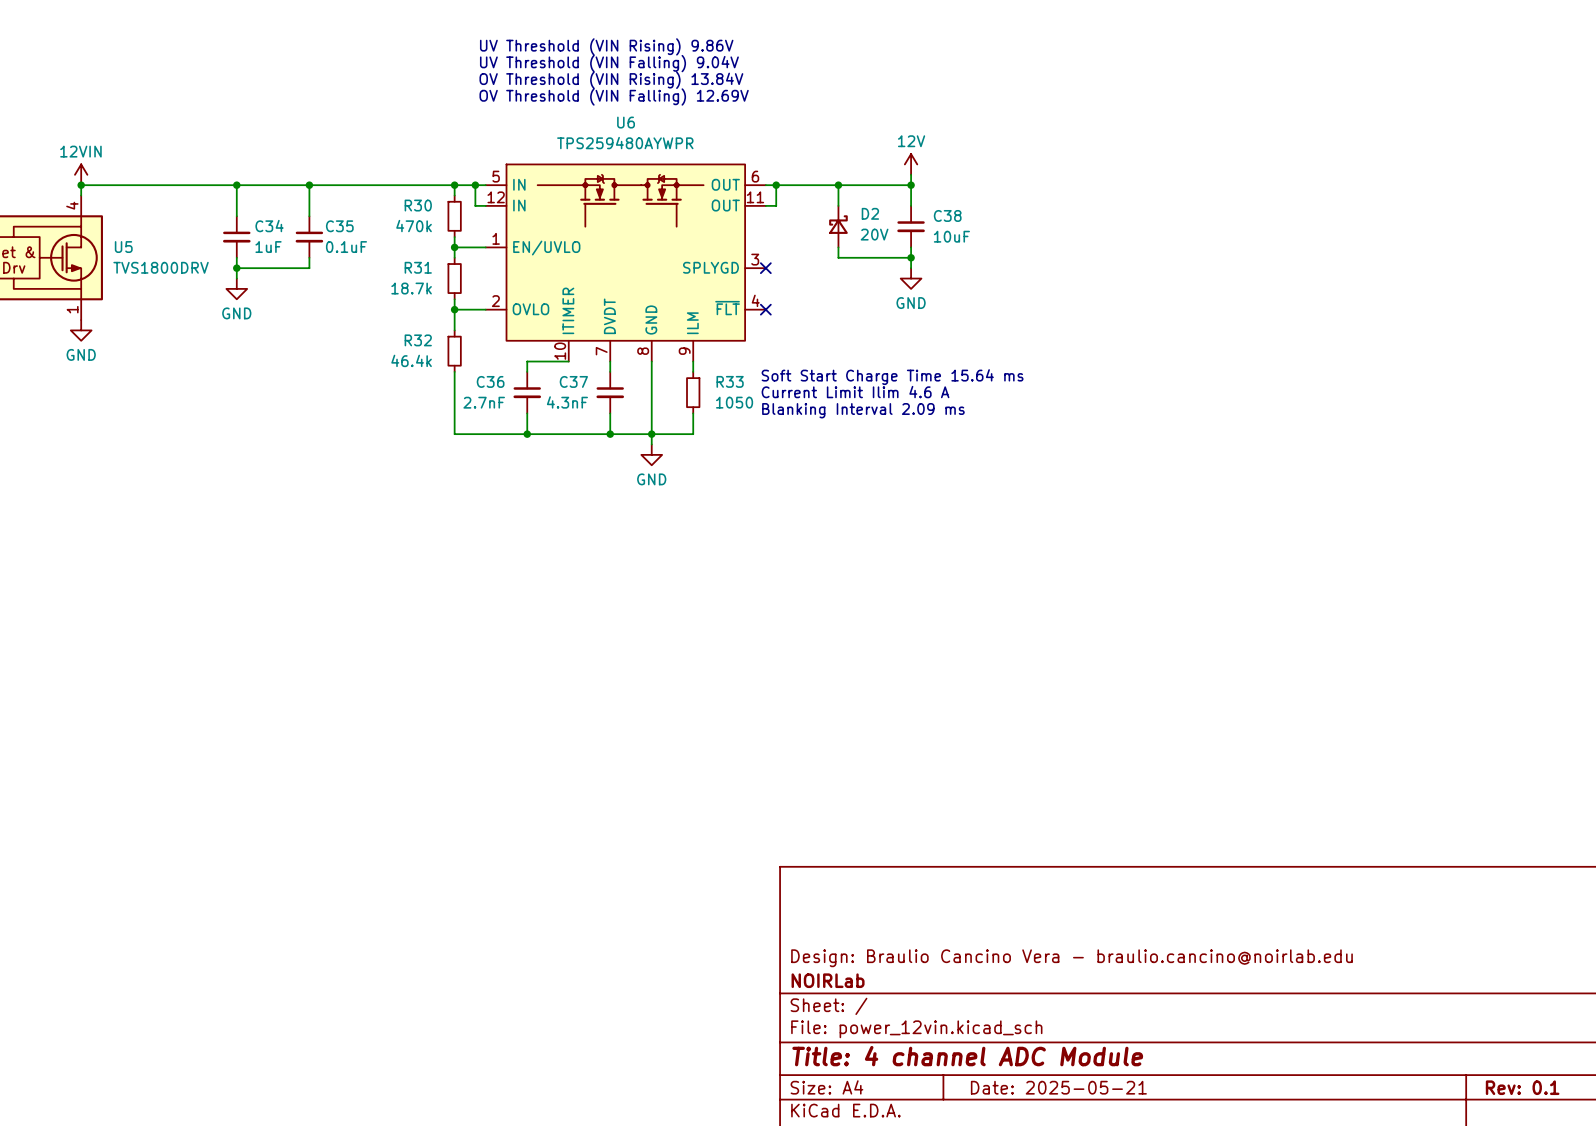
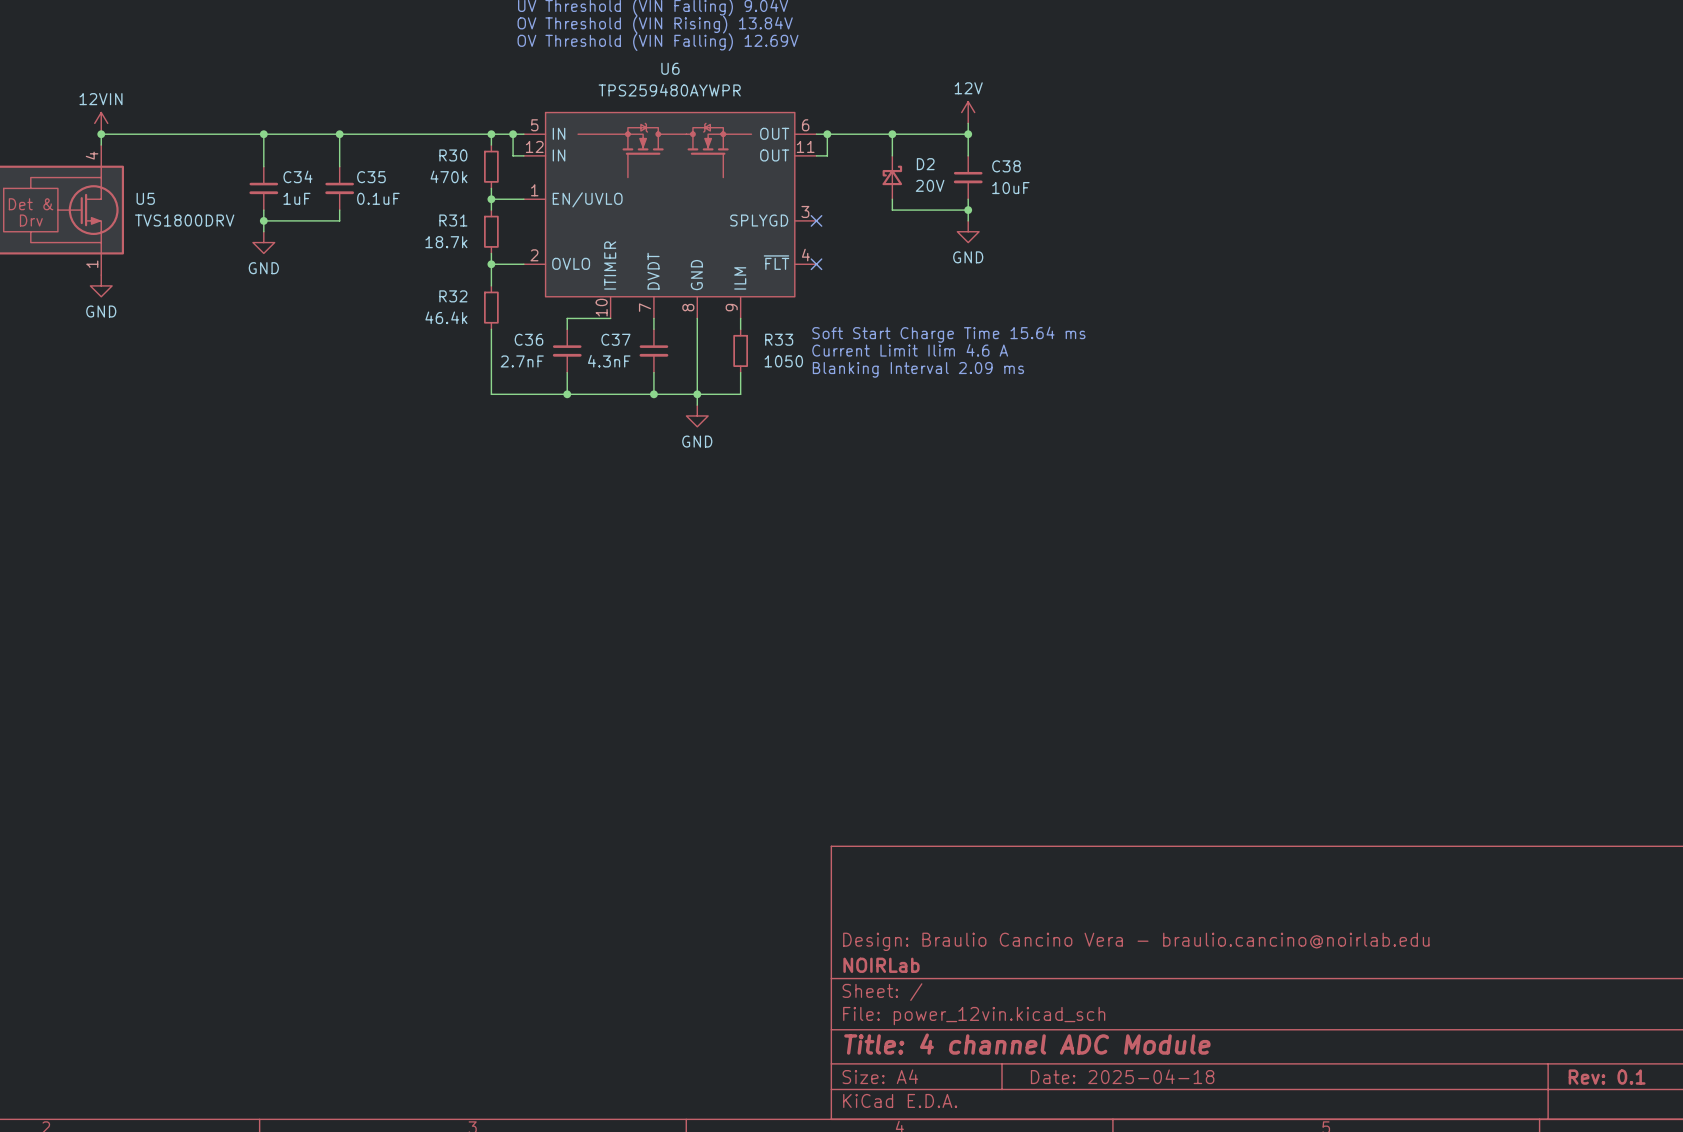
title block: Date: 2025-05-21 (1058, 1087) -> Date: 2025-04-18 (1122, 1076)

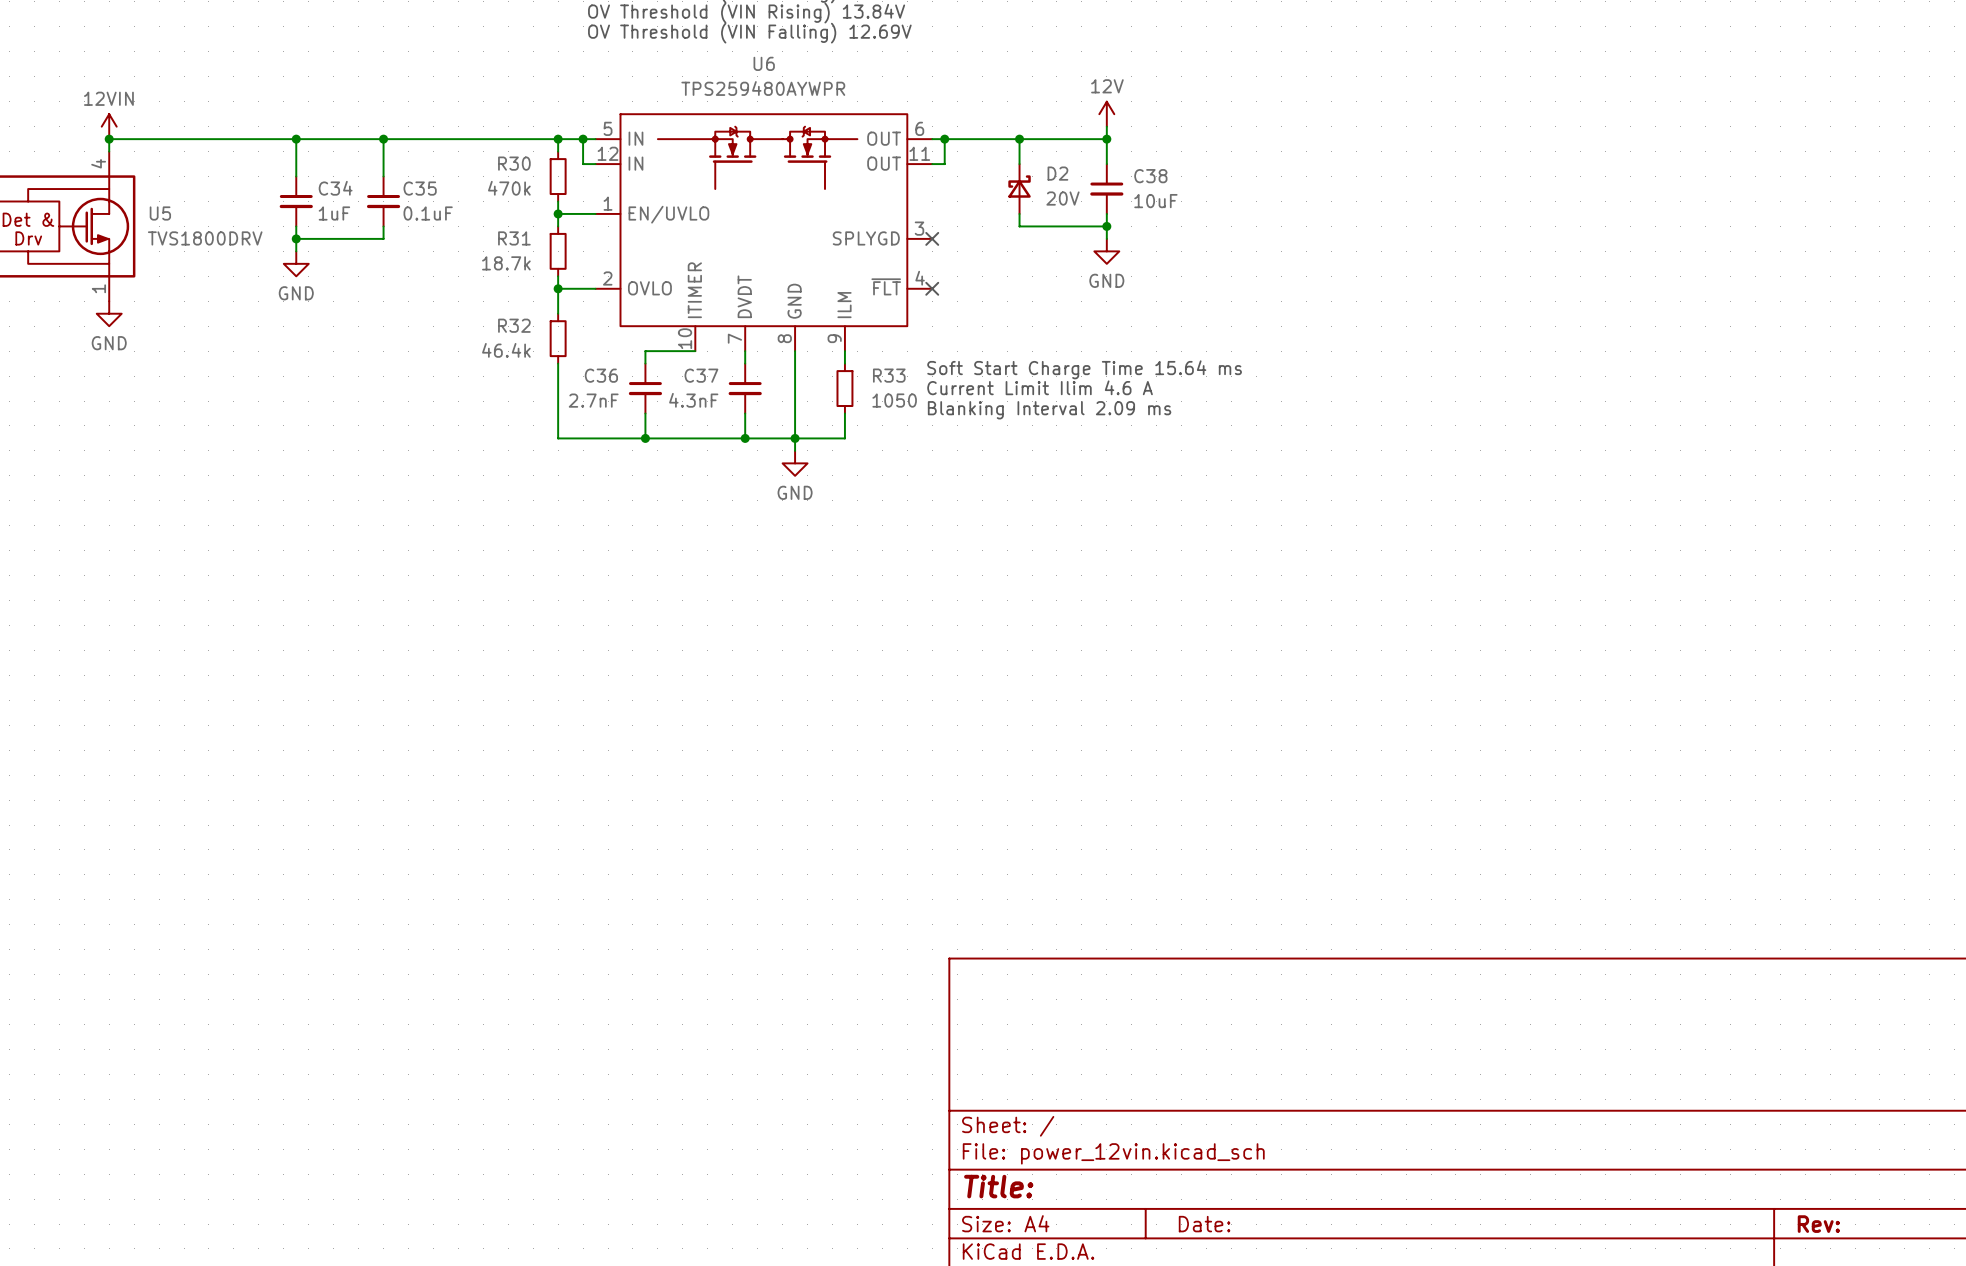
title block: Design: Braulio Cancino Vera - braulio.cancino@noirlab.edu (1136, 941) -> none
title block: NOIRLab (881, 965) -> none
title block: Title: 4 channel ADC Module (1027, 1044) -> Title: (998, 1186)
title block: Date: 2025-04-18 (1122, 1076) -> Date: (1204, 1224)
title block: Rev: 0.1 (1607, 1077) -> Rev: (1818, 1224)

